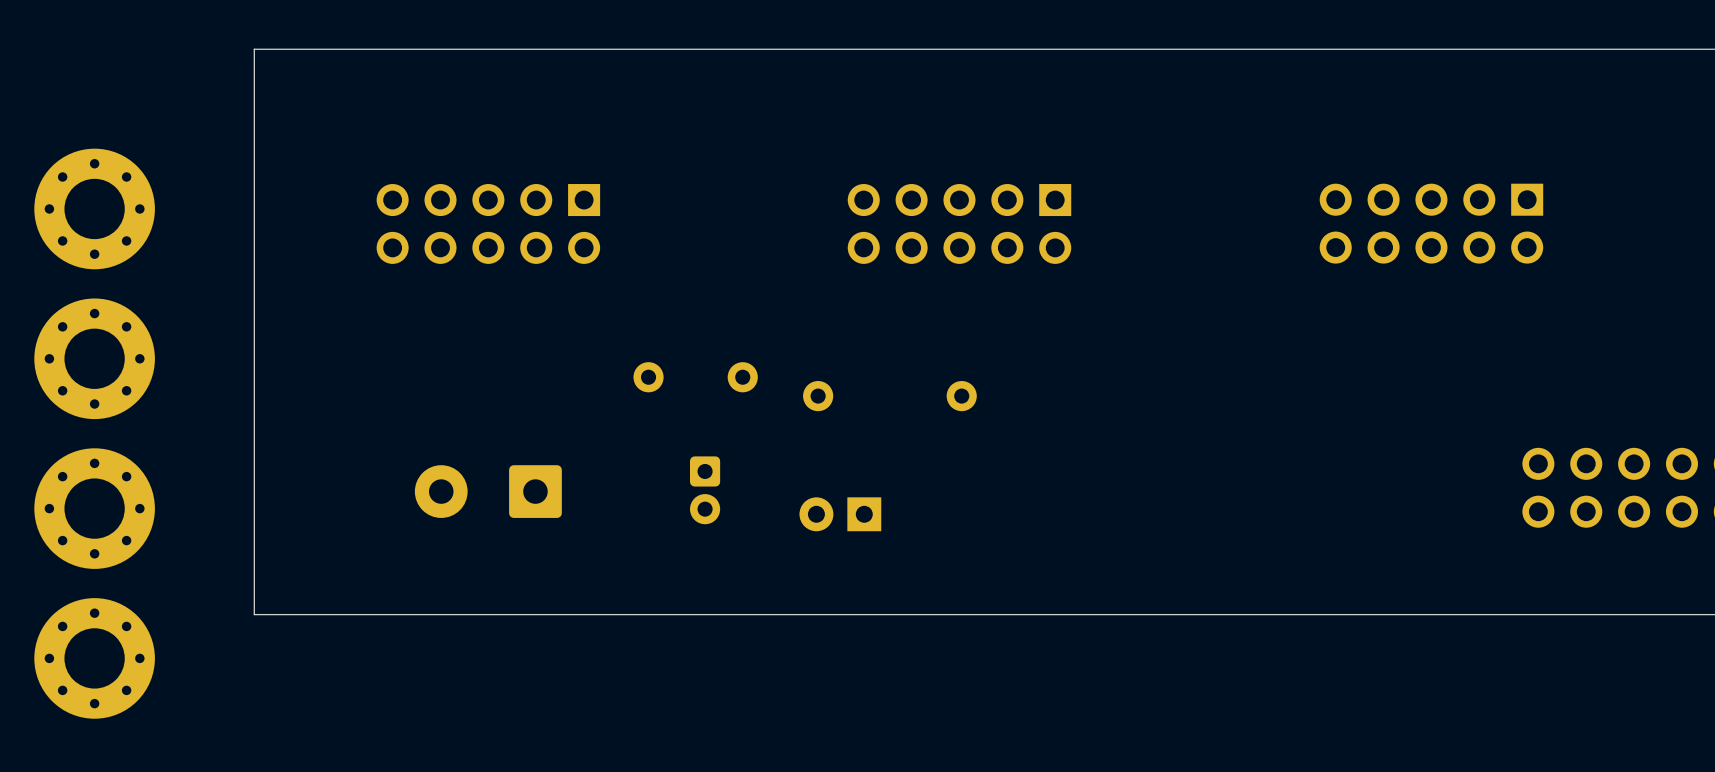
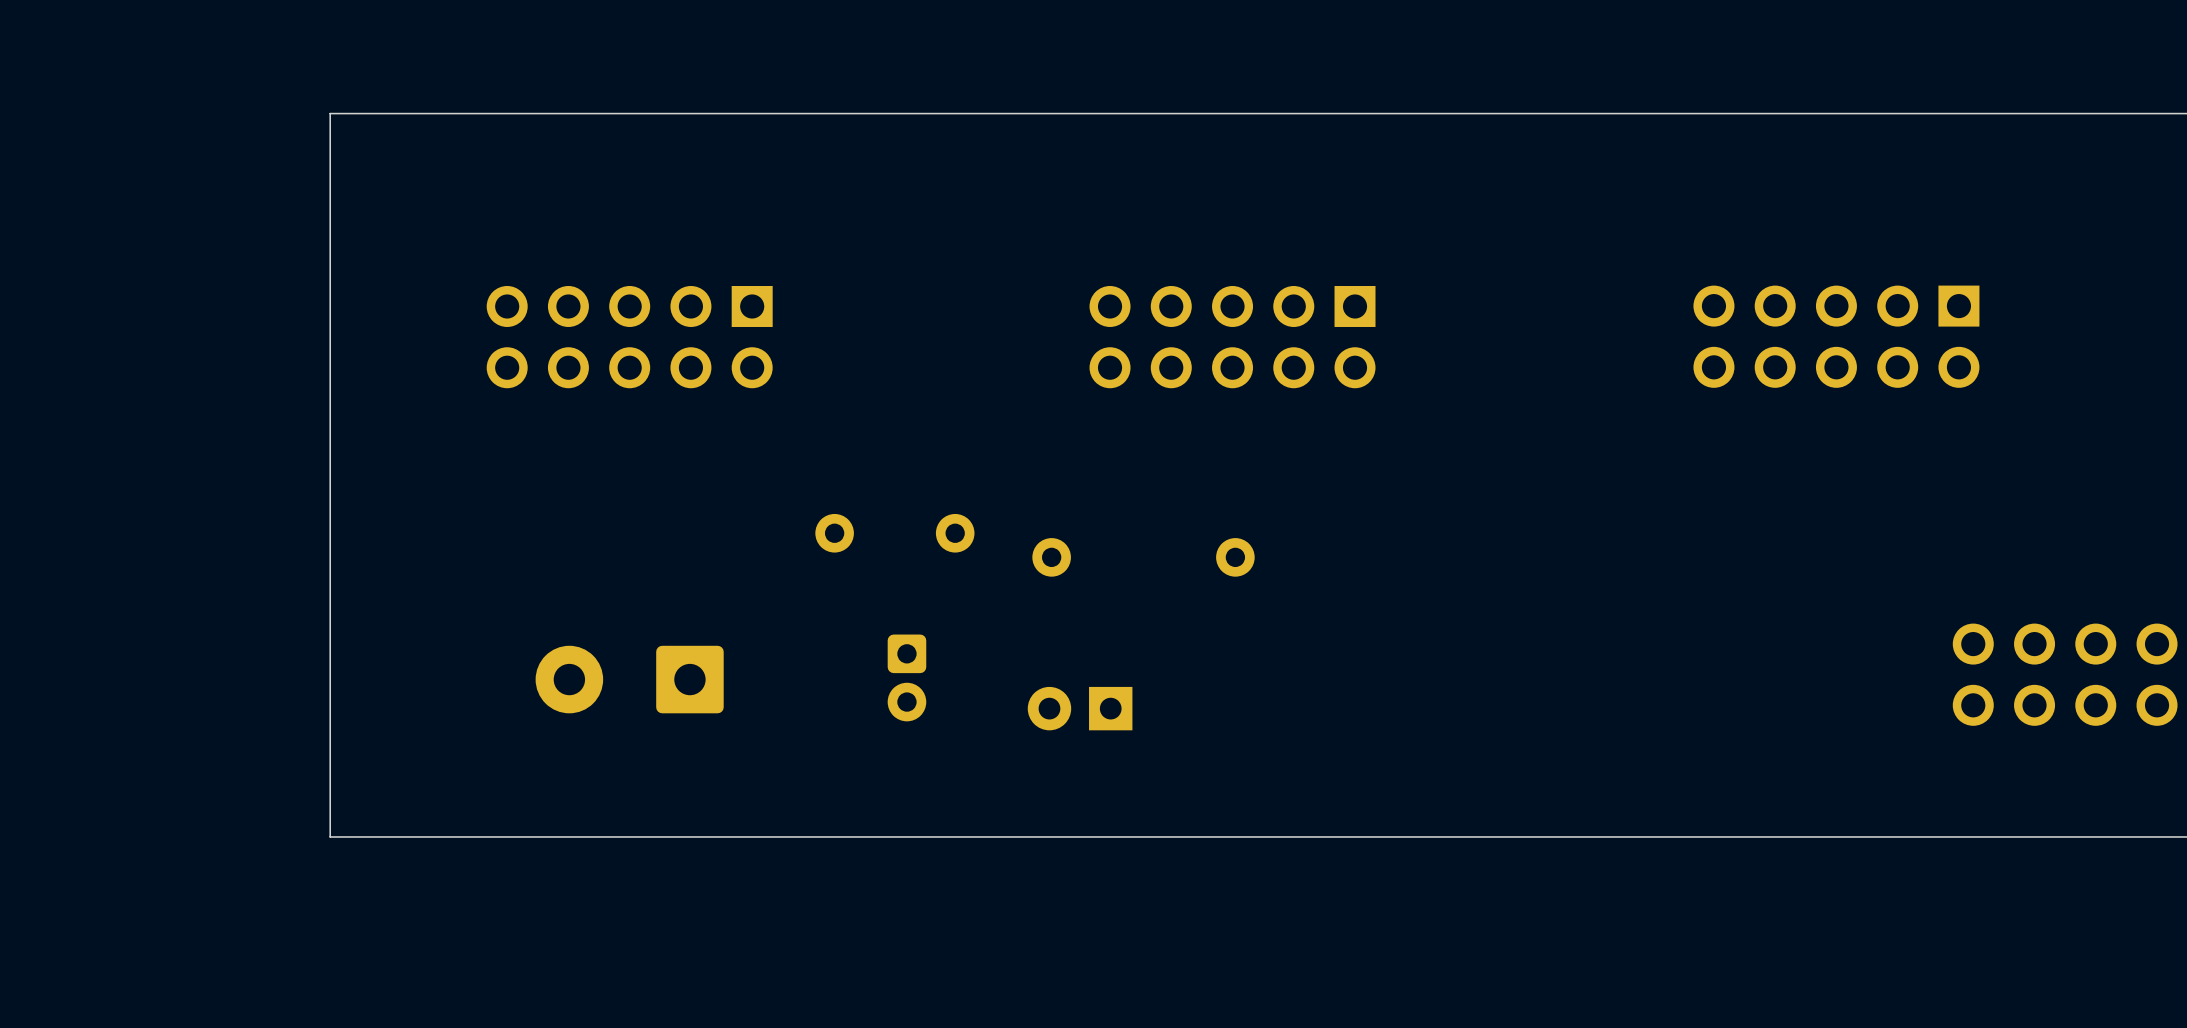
part: (94, 208) -> none
part: (94, 358) -> none
part: (94, 508) -> none
part: (94, 658) -> none

